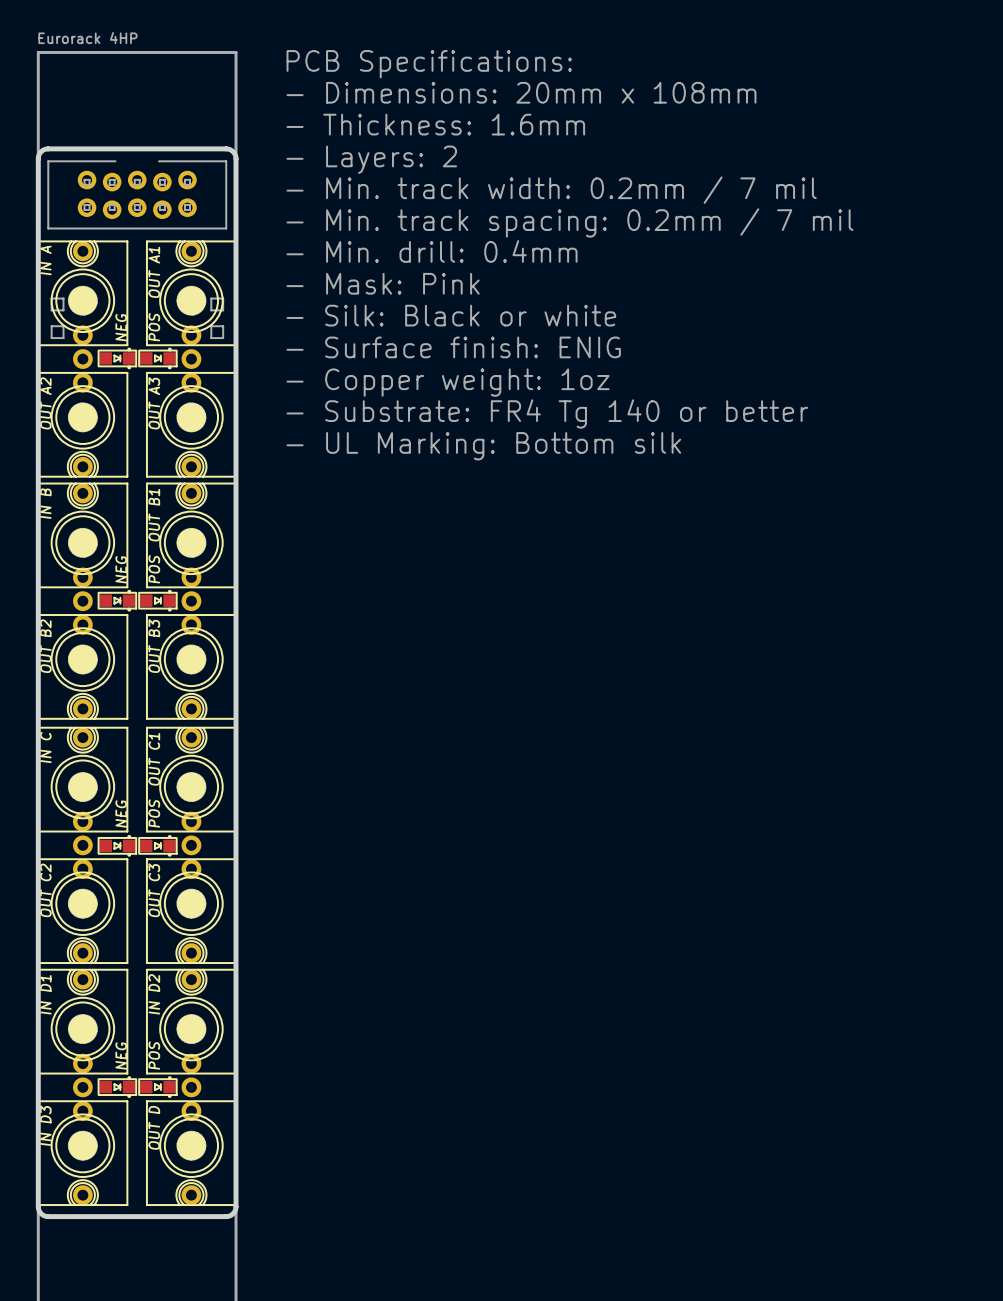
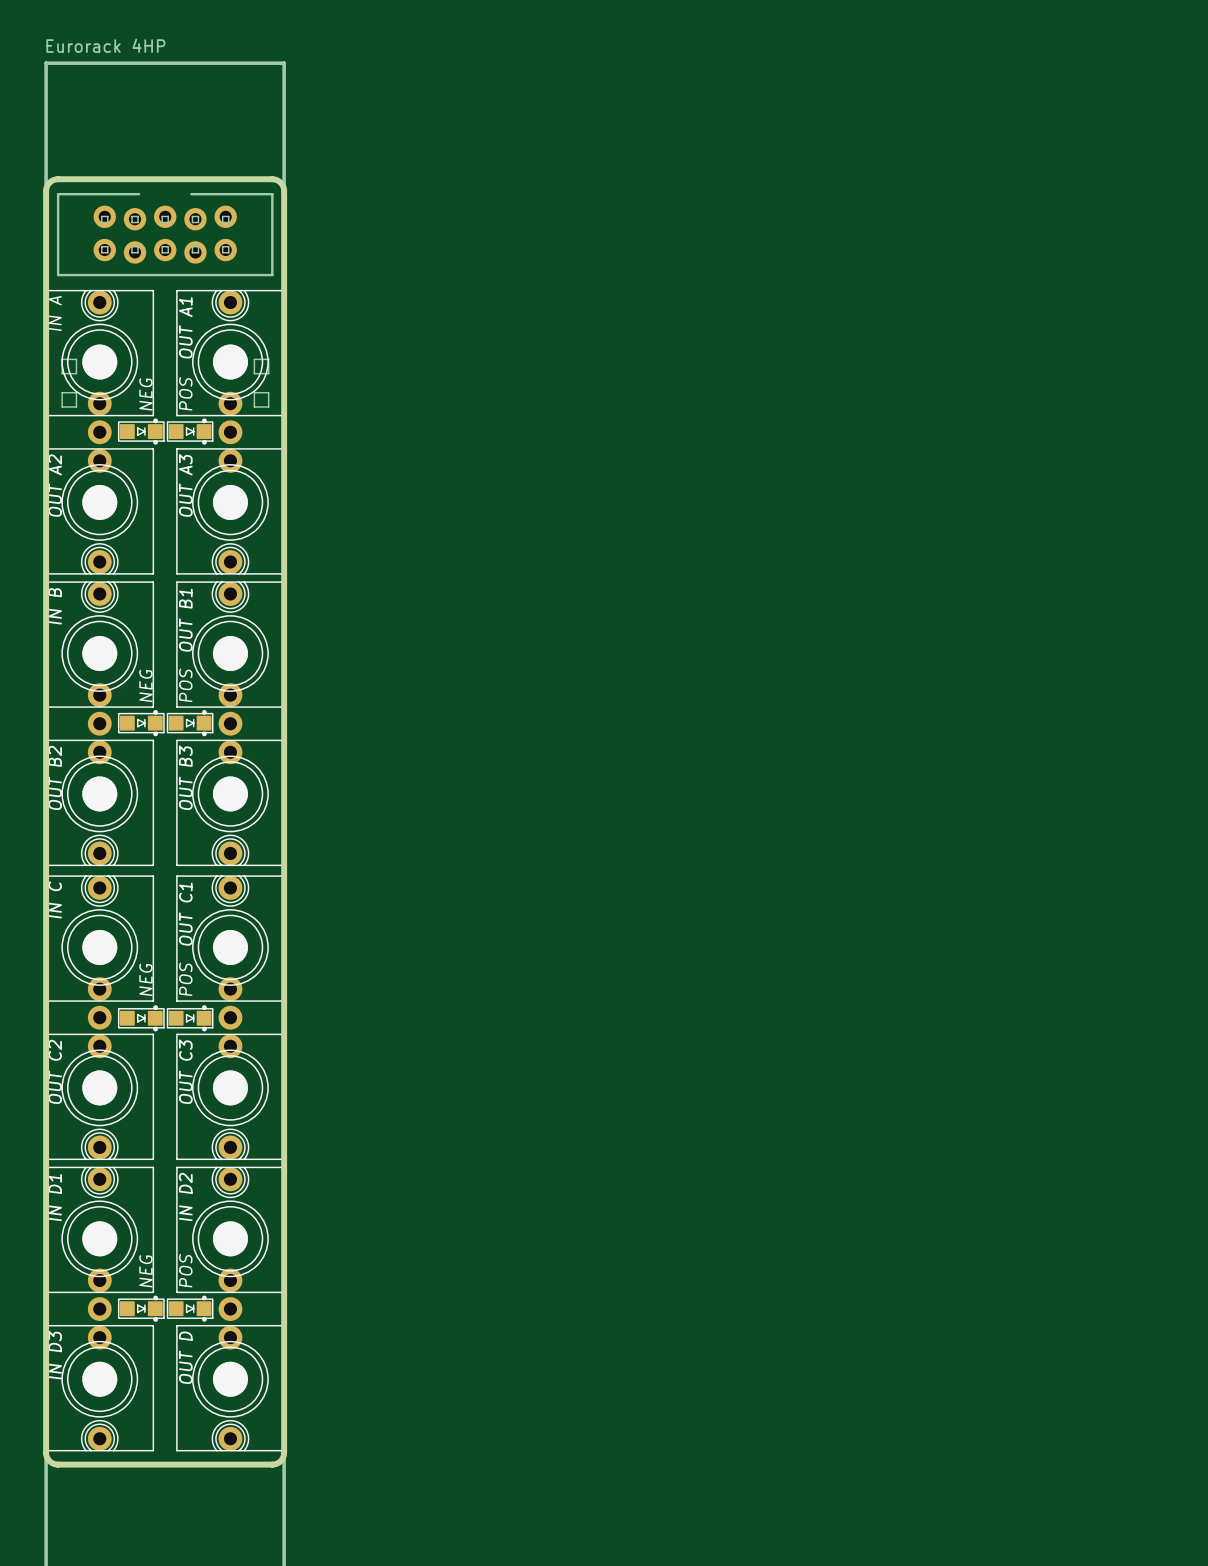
text: PCB Specifications: (429, 64) -> none
text: - Dimensions: 20mm x 108mm (521, 92) -> none
text: - Thickness: 1.6mm (435, 124) -> none
text: - Layers: 2 (371, 159) -> none
text: - Min. track width: 0.2mm / 7 mil (551, 190) -> none
text: - Min. track spacing: 0.2mm / 7 mil (569, 222) -> none
text: - Min. drill: 0.4mm (432, 251) -> none
text: - Mask: Pink (383, 283) -> none
text: - Silk: Black or white (451, 315) -> none
text: - Surface finish: ENIG (453, 347) -> none
text: - Copper weight: 1oz (448, 382) -> none
text: - Substrate: FR4 Tg 140 or better (547, 413) -> none
text: - UL Marking: Bottom silk (483, 446) -> none

